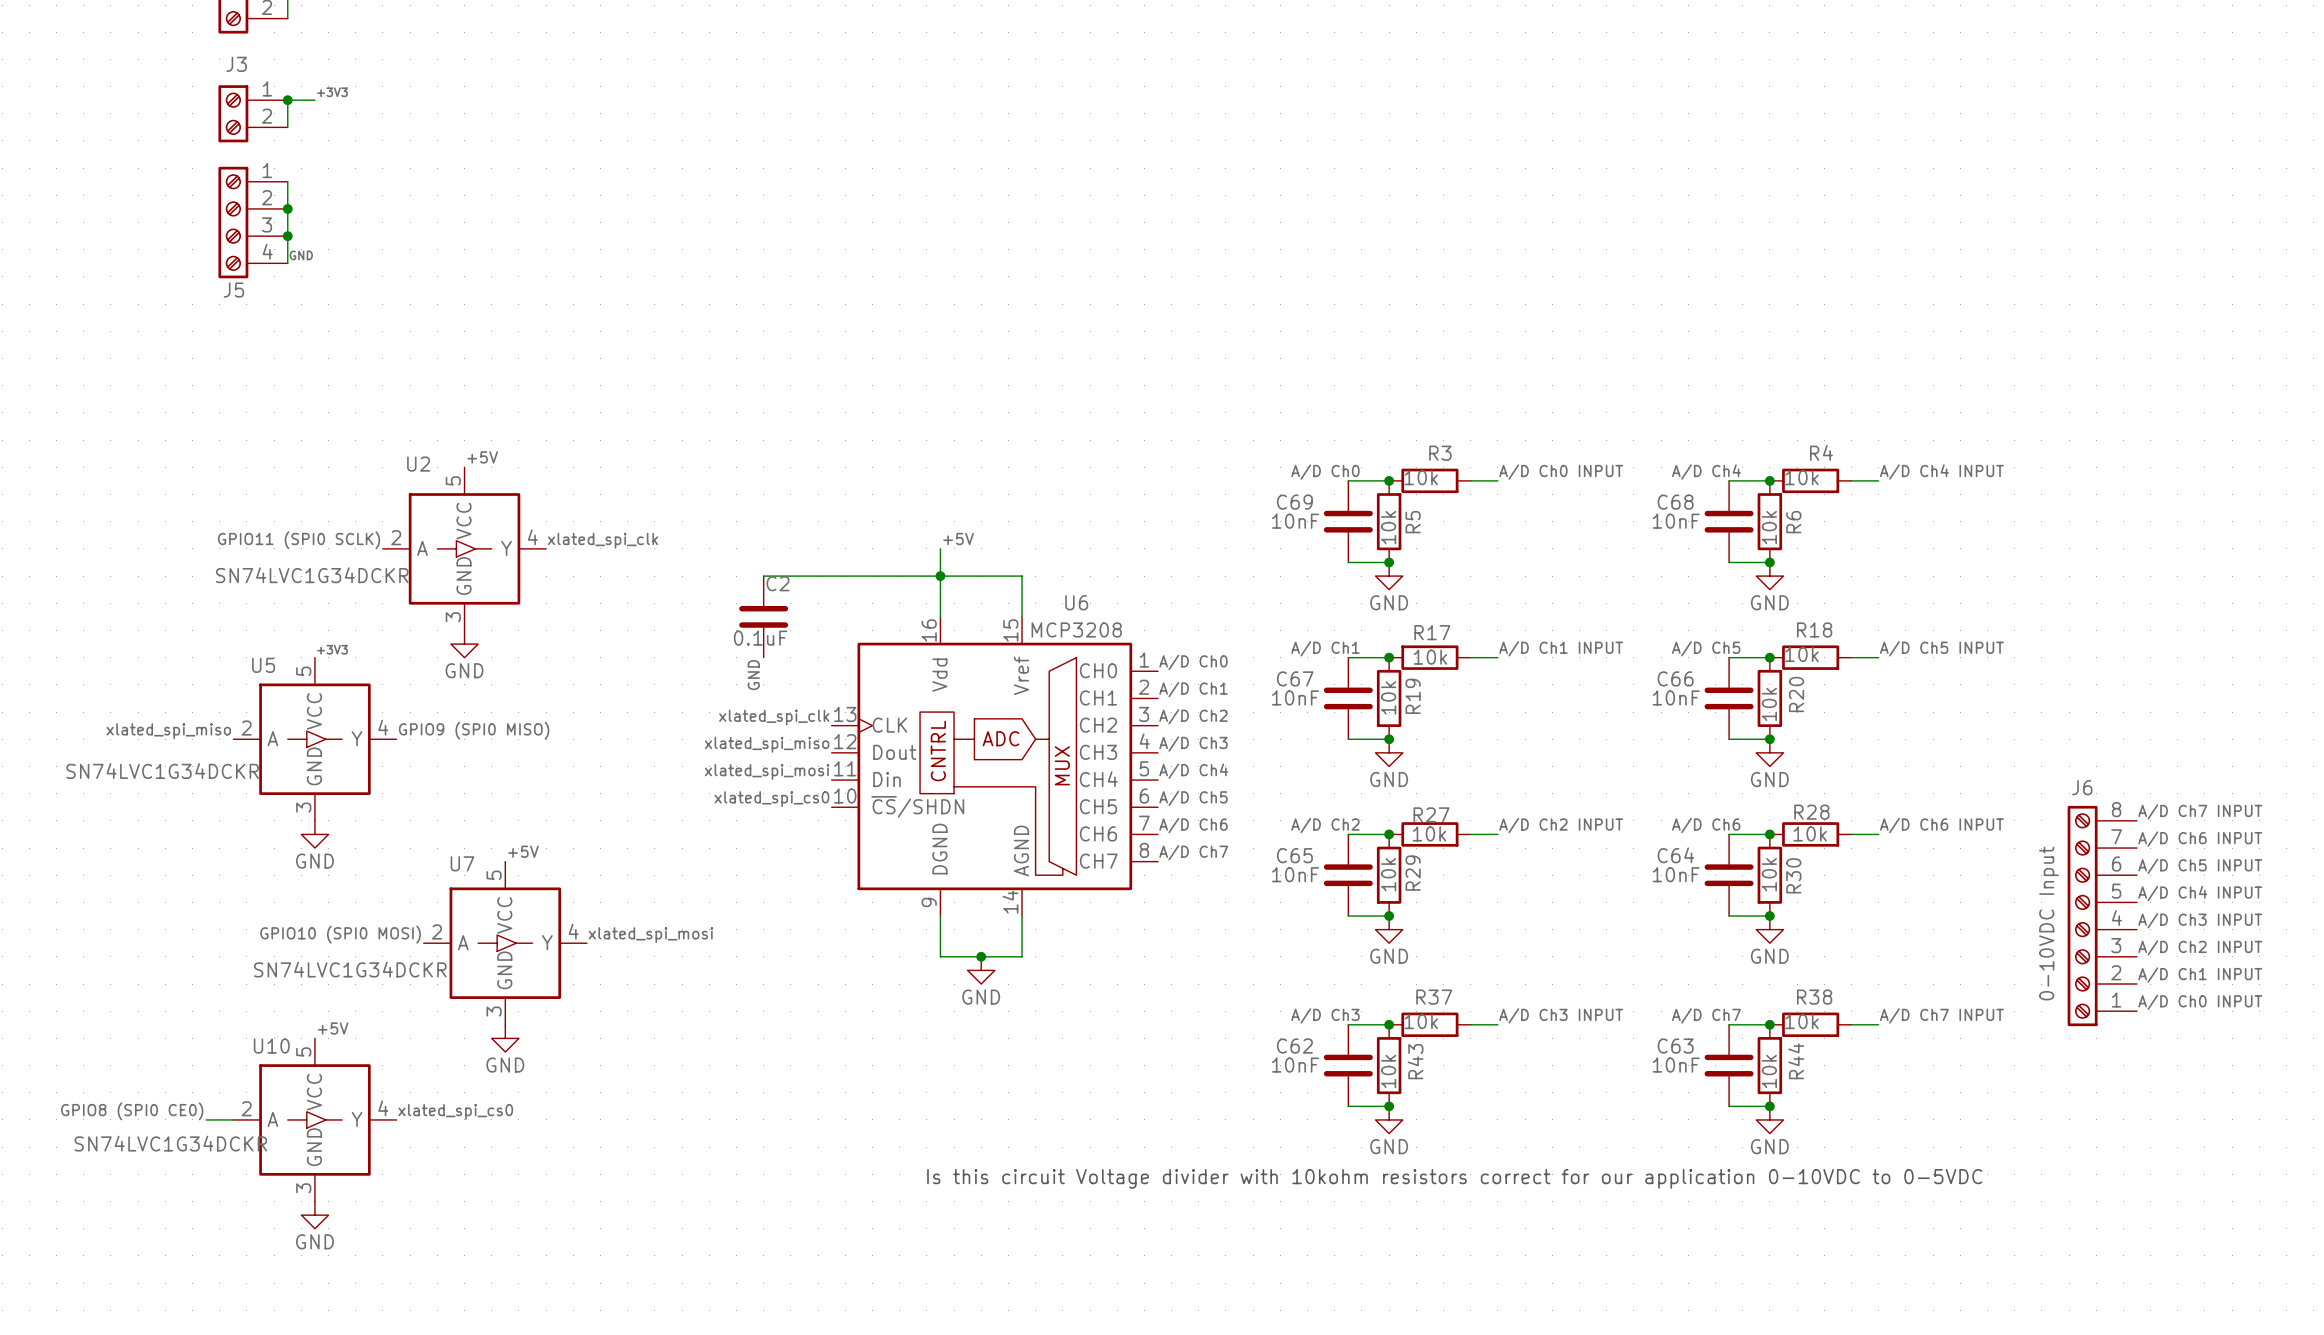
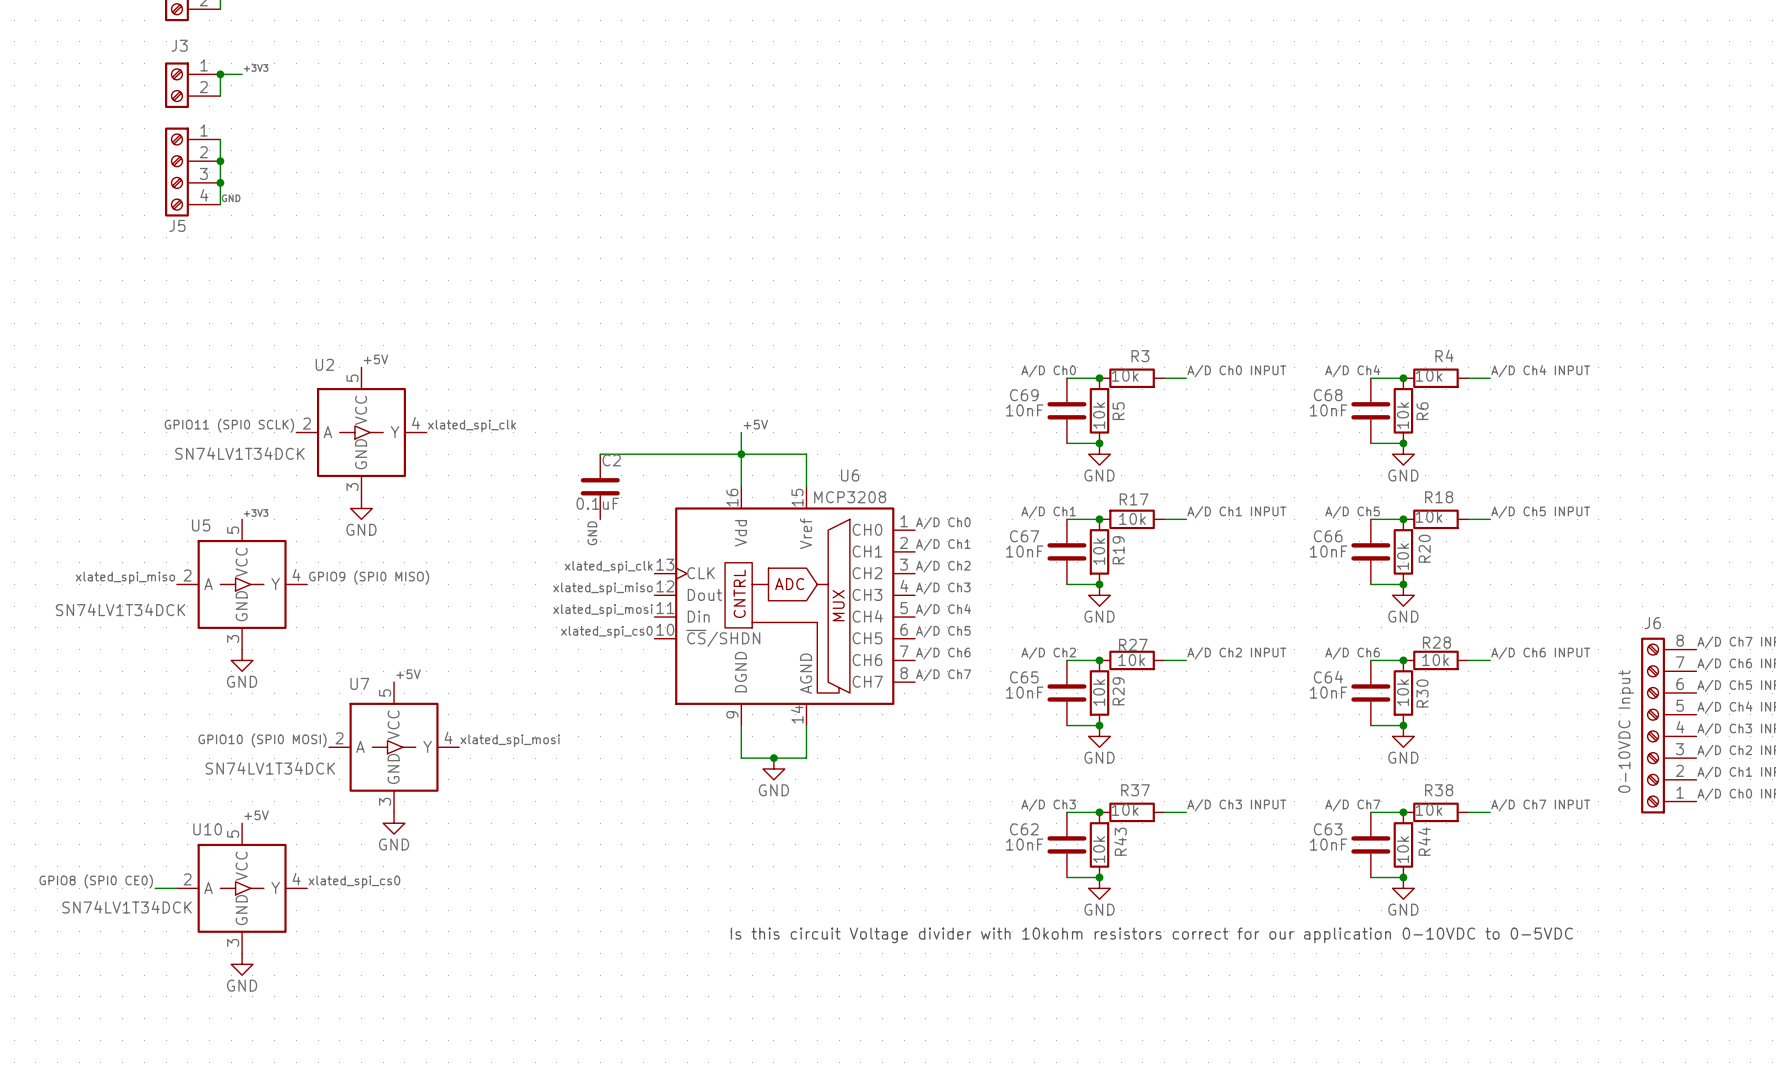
U2 value: SN74LVC1G34DCKR (312, 575) -> SN74LV1T34DCK (239, 453)
U5 value: SN74LVC1G34DCKR (162, 771) -> SN74LV1T34DCK (120, 609)
U7 value: SN74LVC1G34DCKR (350, 969) -> SN74LV1T34DCK (270, 768)
U10 value: SN74LVC1G34DCKR (170, 1143) -> SN74LV1T34DCK (127, 907)

